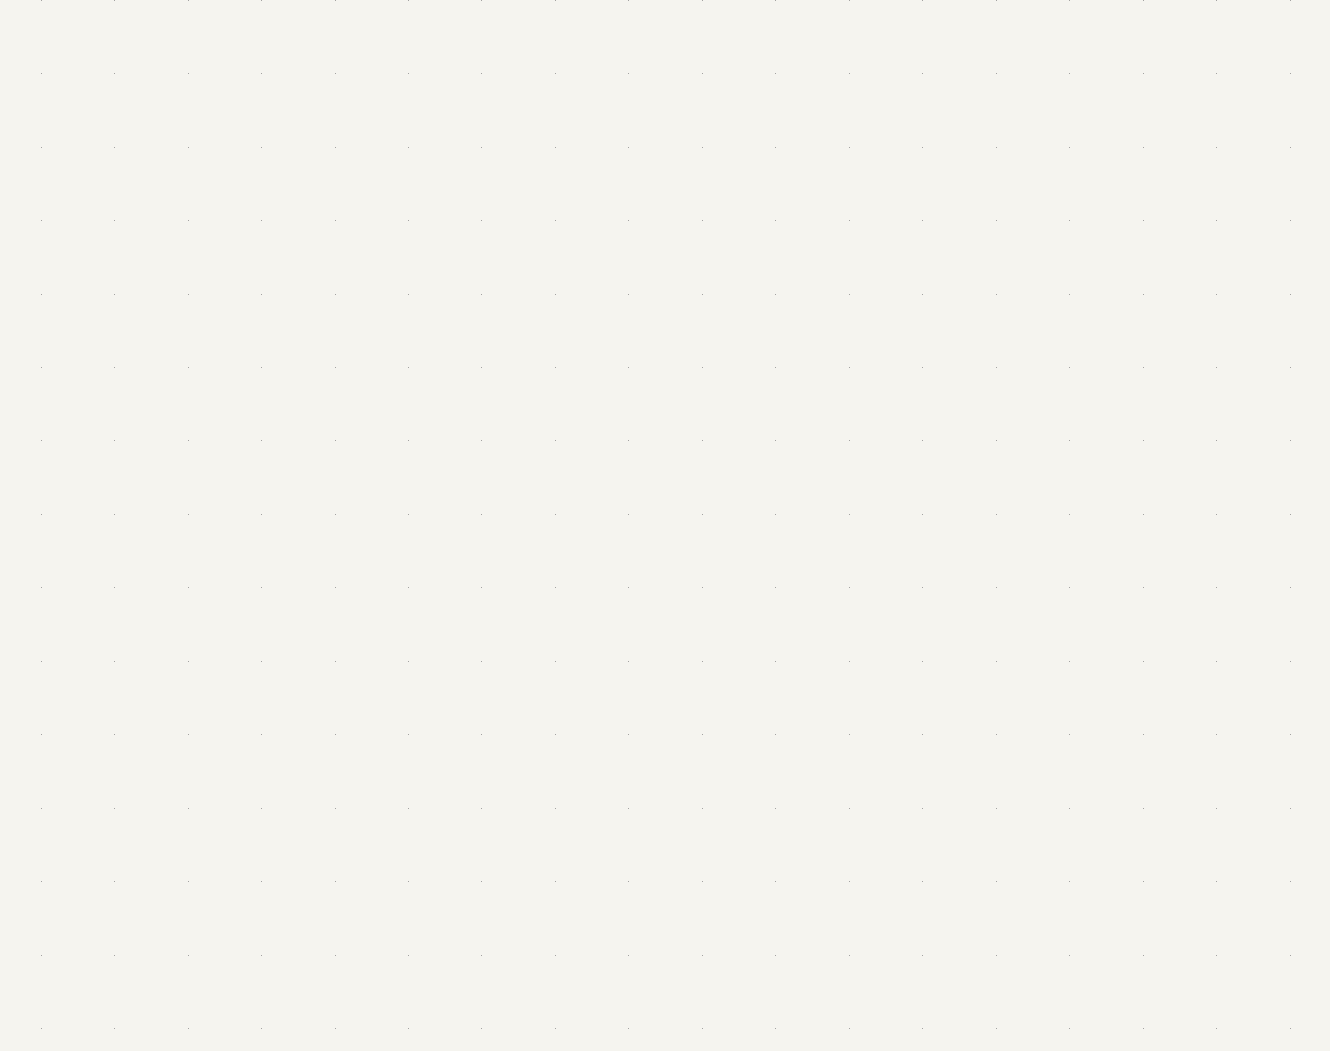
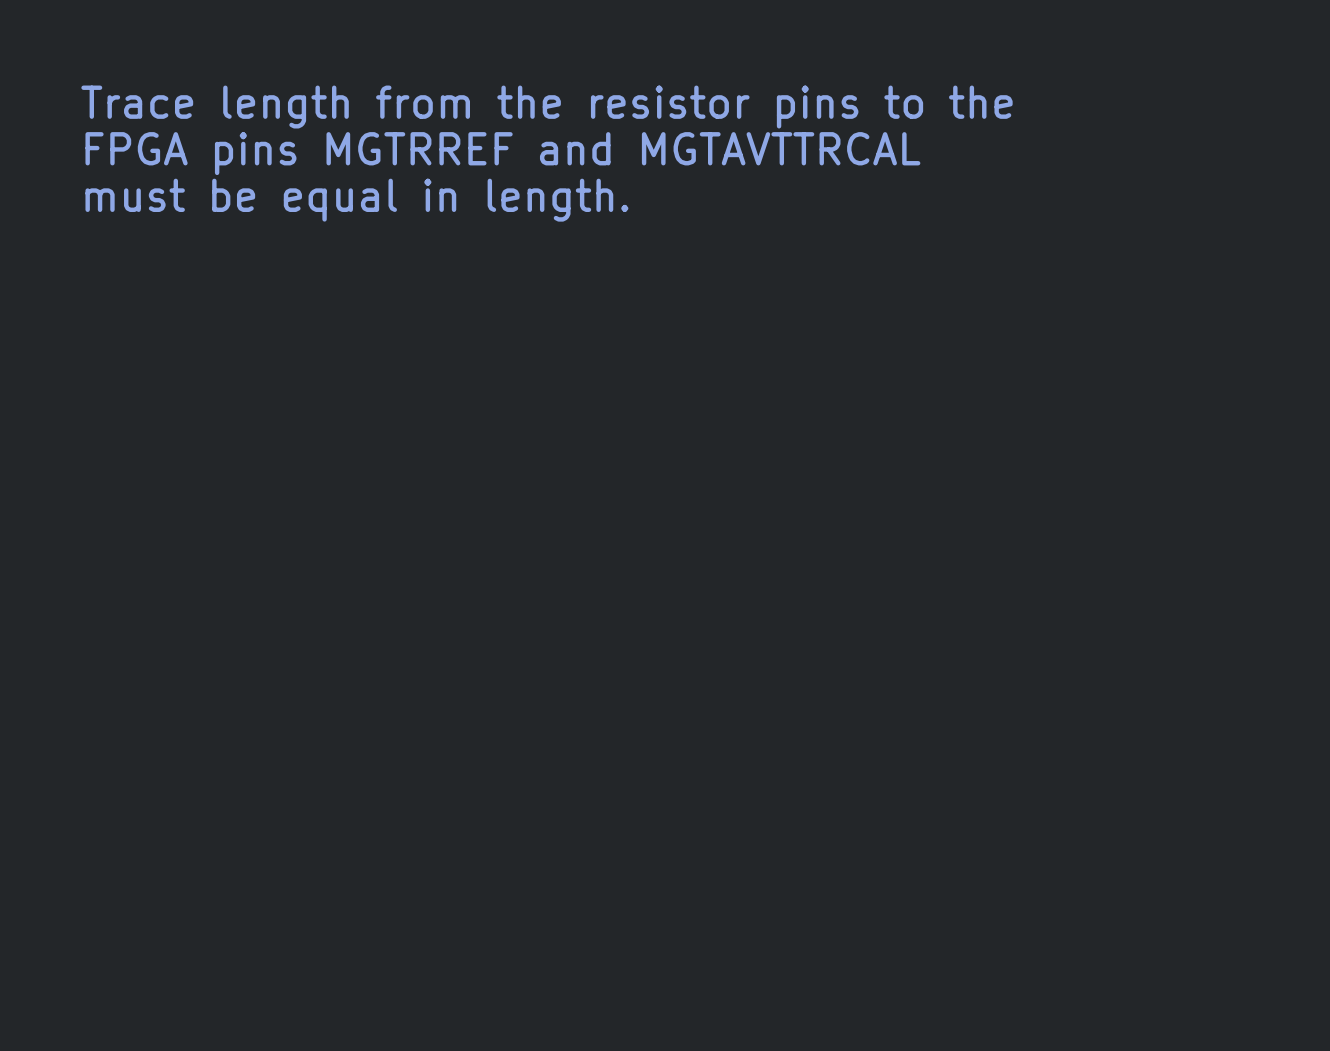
text: none -> Trace length from the resistor pins to the (546, 107)
text: none -> FPGA pins MGTRREF and MGTAVTTRCAL (502, 153)
text: none -> must be equal in length. (356, 200)

